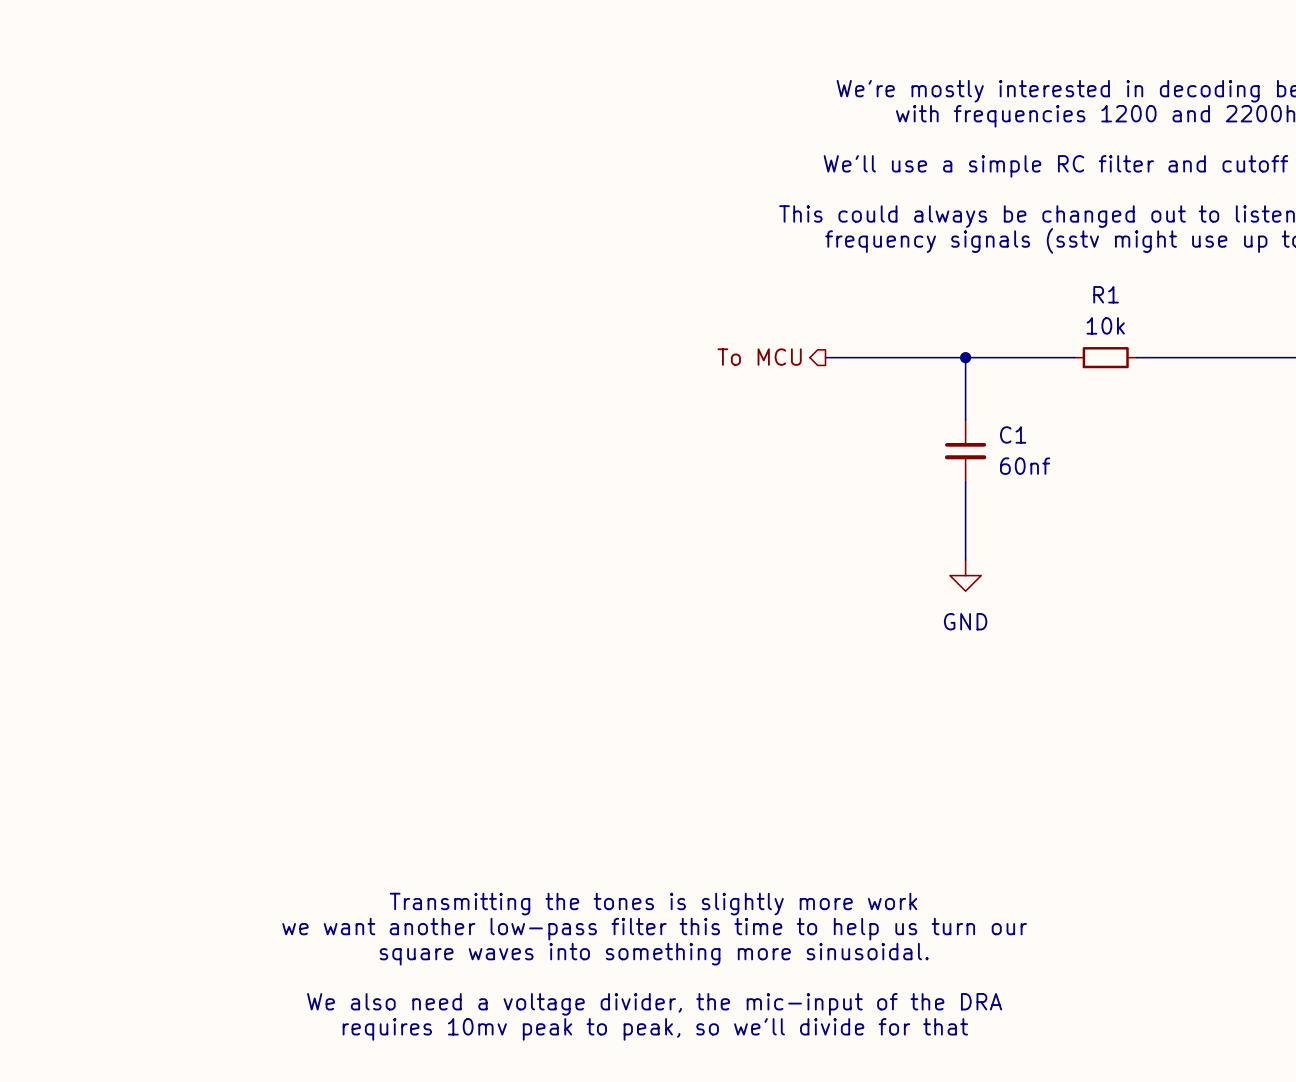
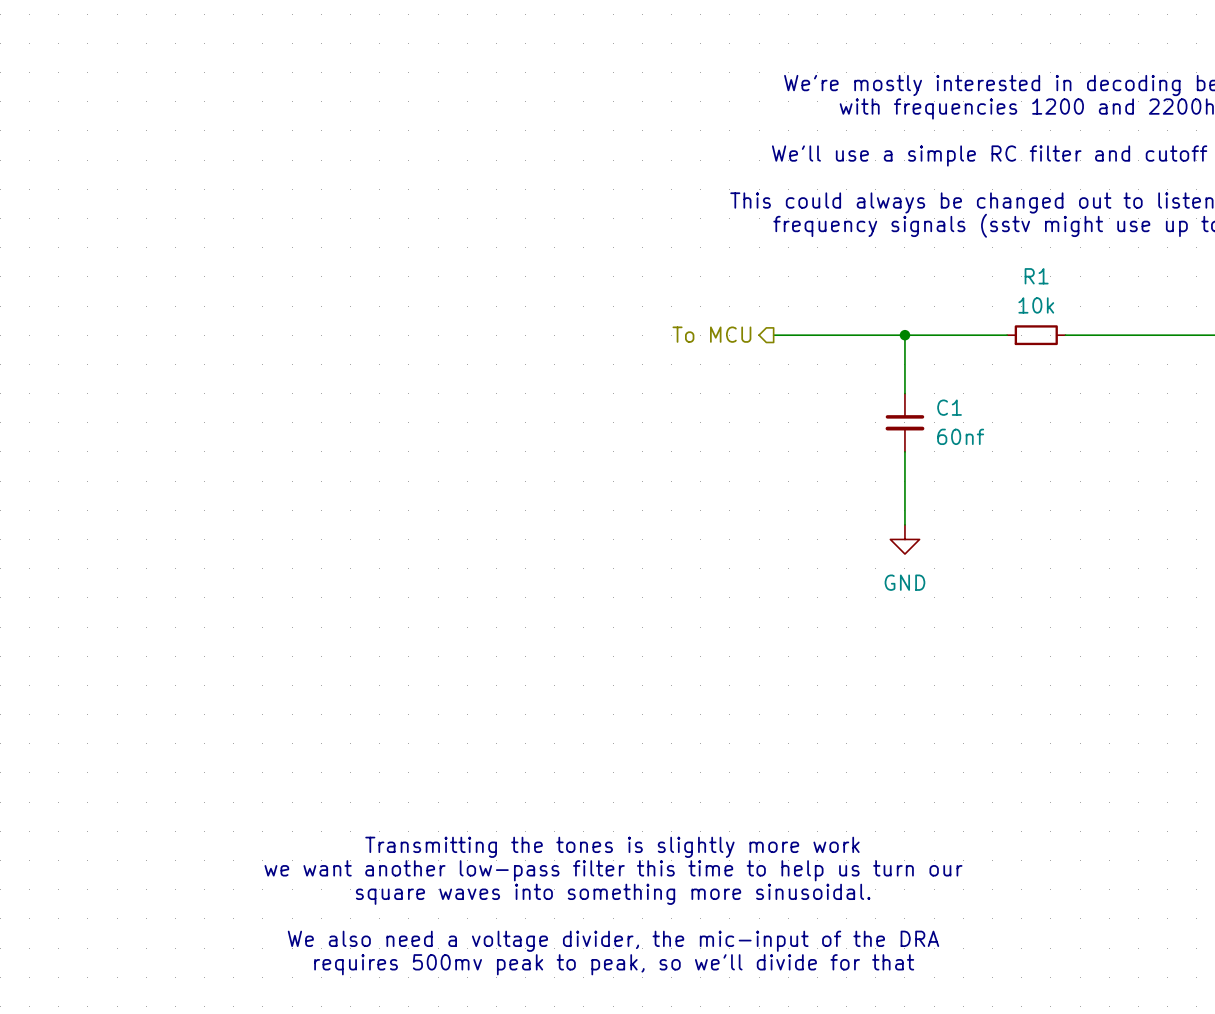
text: requires 10mv peak to peak, so we'll divide for that (655, 1029) -> requires 500mv peak to peak, so we'll divide for that (614, 964)

